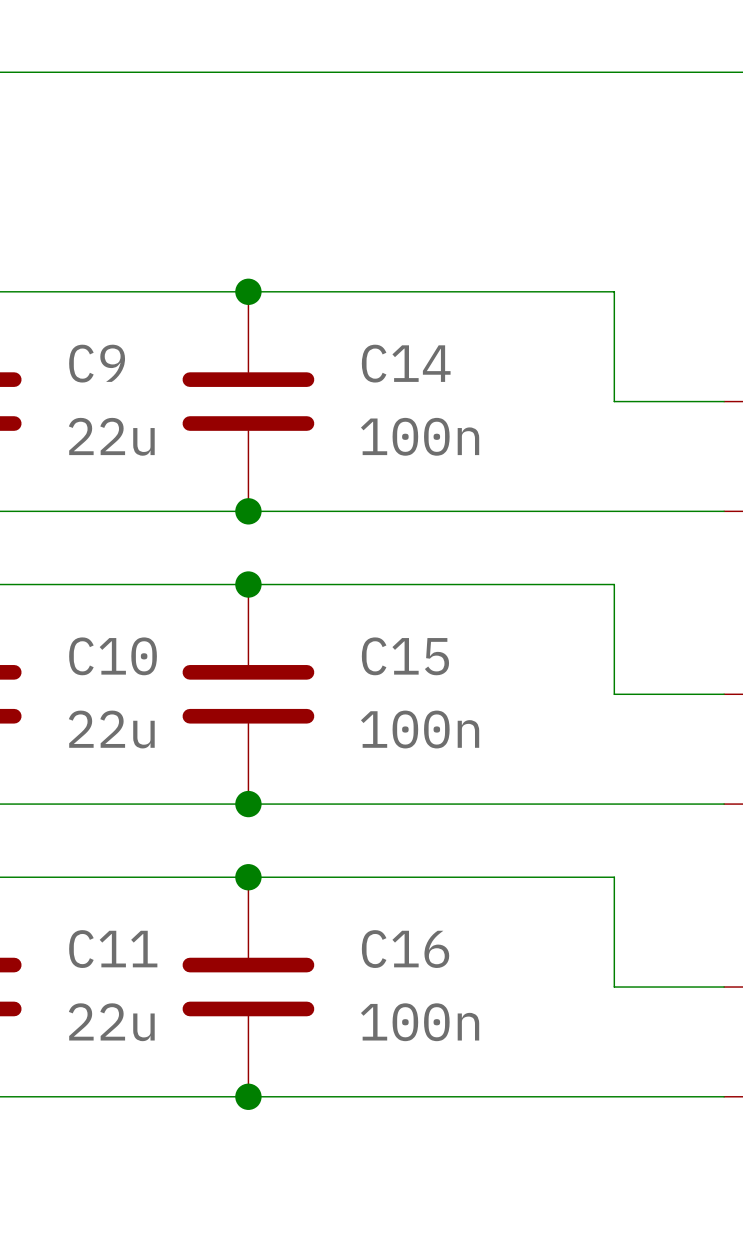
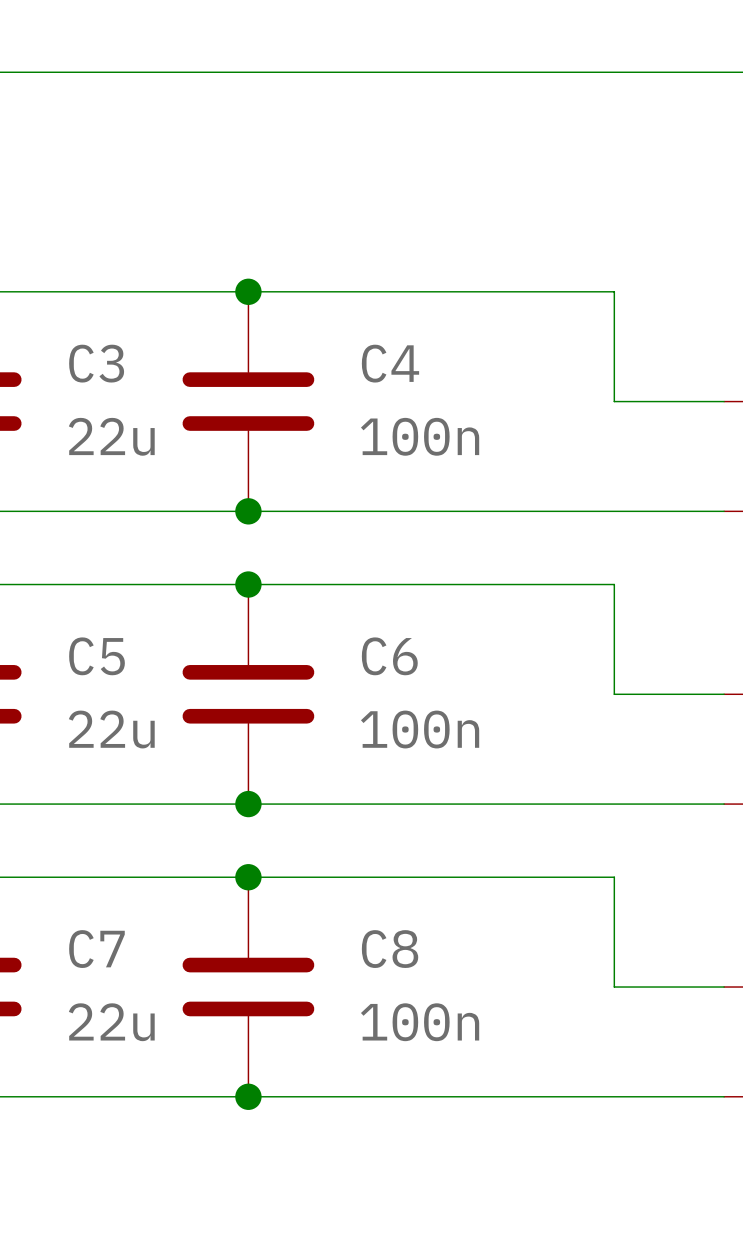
C9 name: C9 (97, 363) -> C3 (96, 363)
C14 name: C14 (406, 363) -> C4 (390, 363)
C10 name: C10 (113, 656) -> C5 (97, 656)
C15 name: C15 (405, 656) -> C6 (389, 656)
C11 name: C11 (113, 949) -> C7 (96, 949)
C16 name: C16 (405, 949) -> C8 (390, 949)

